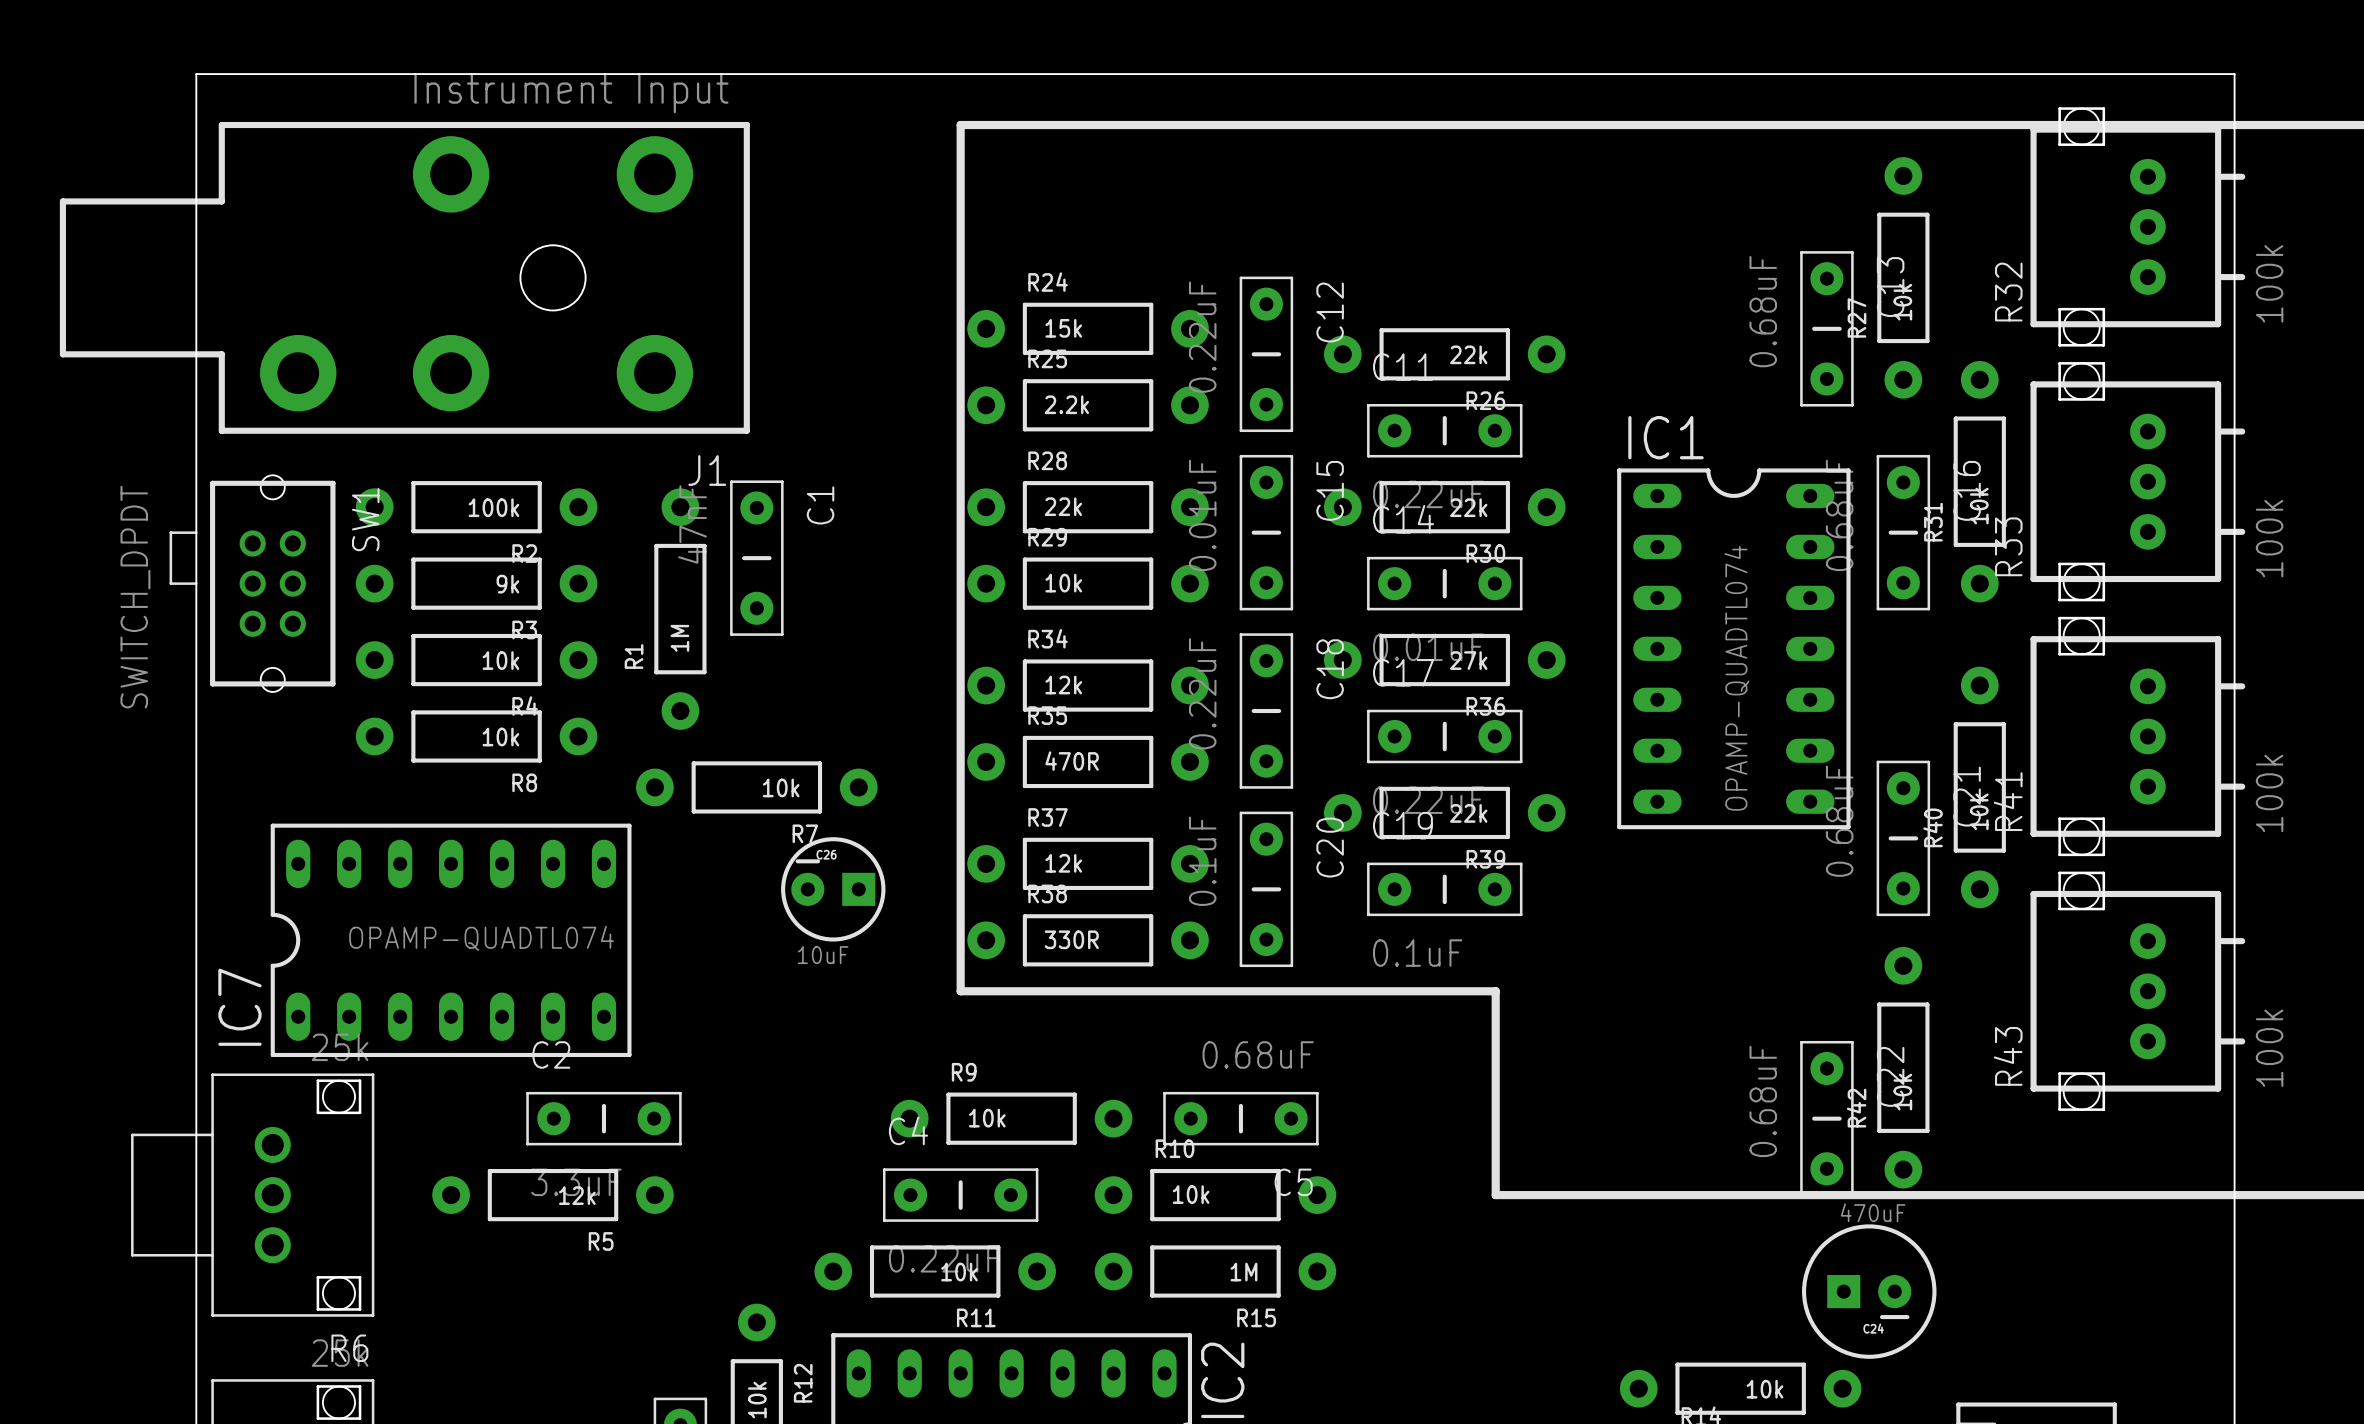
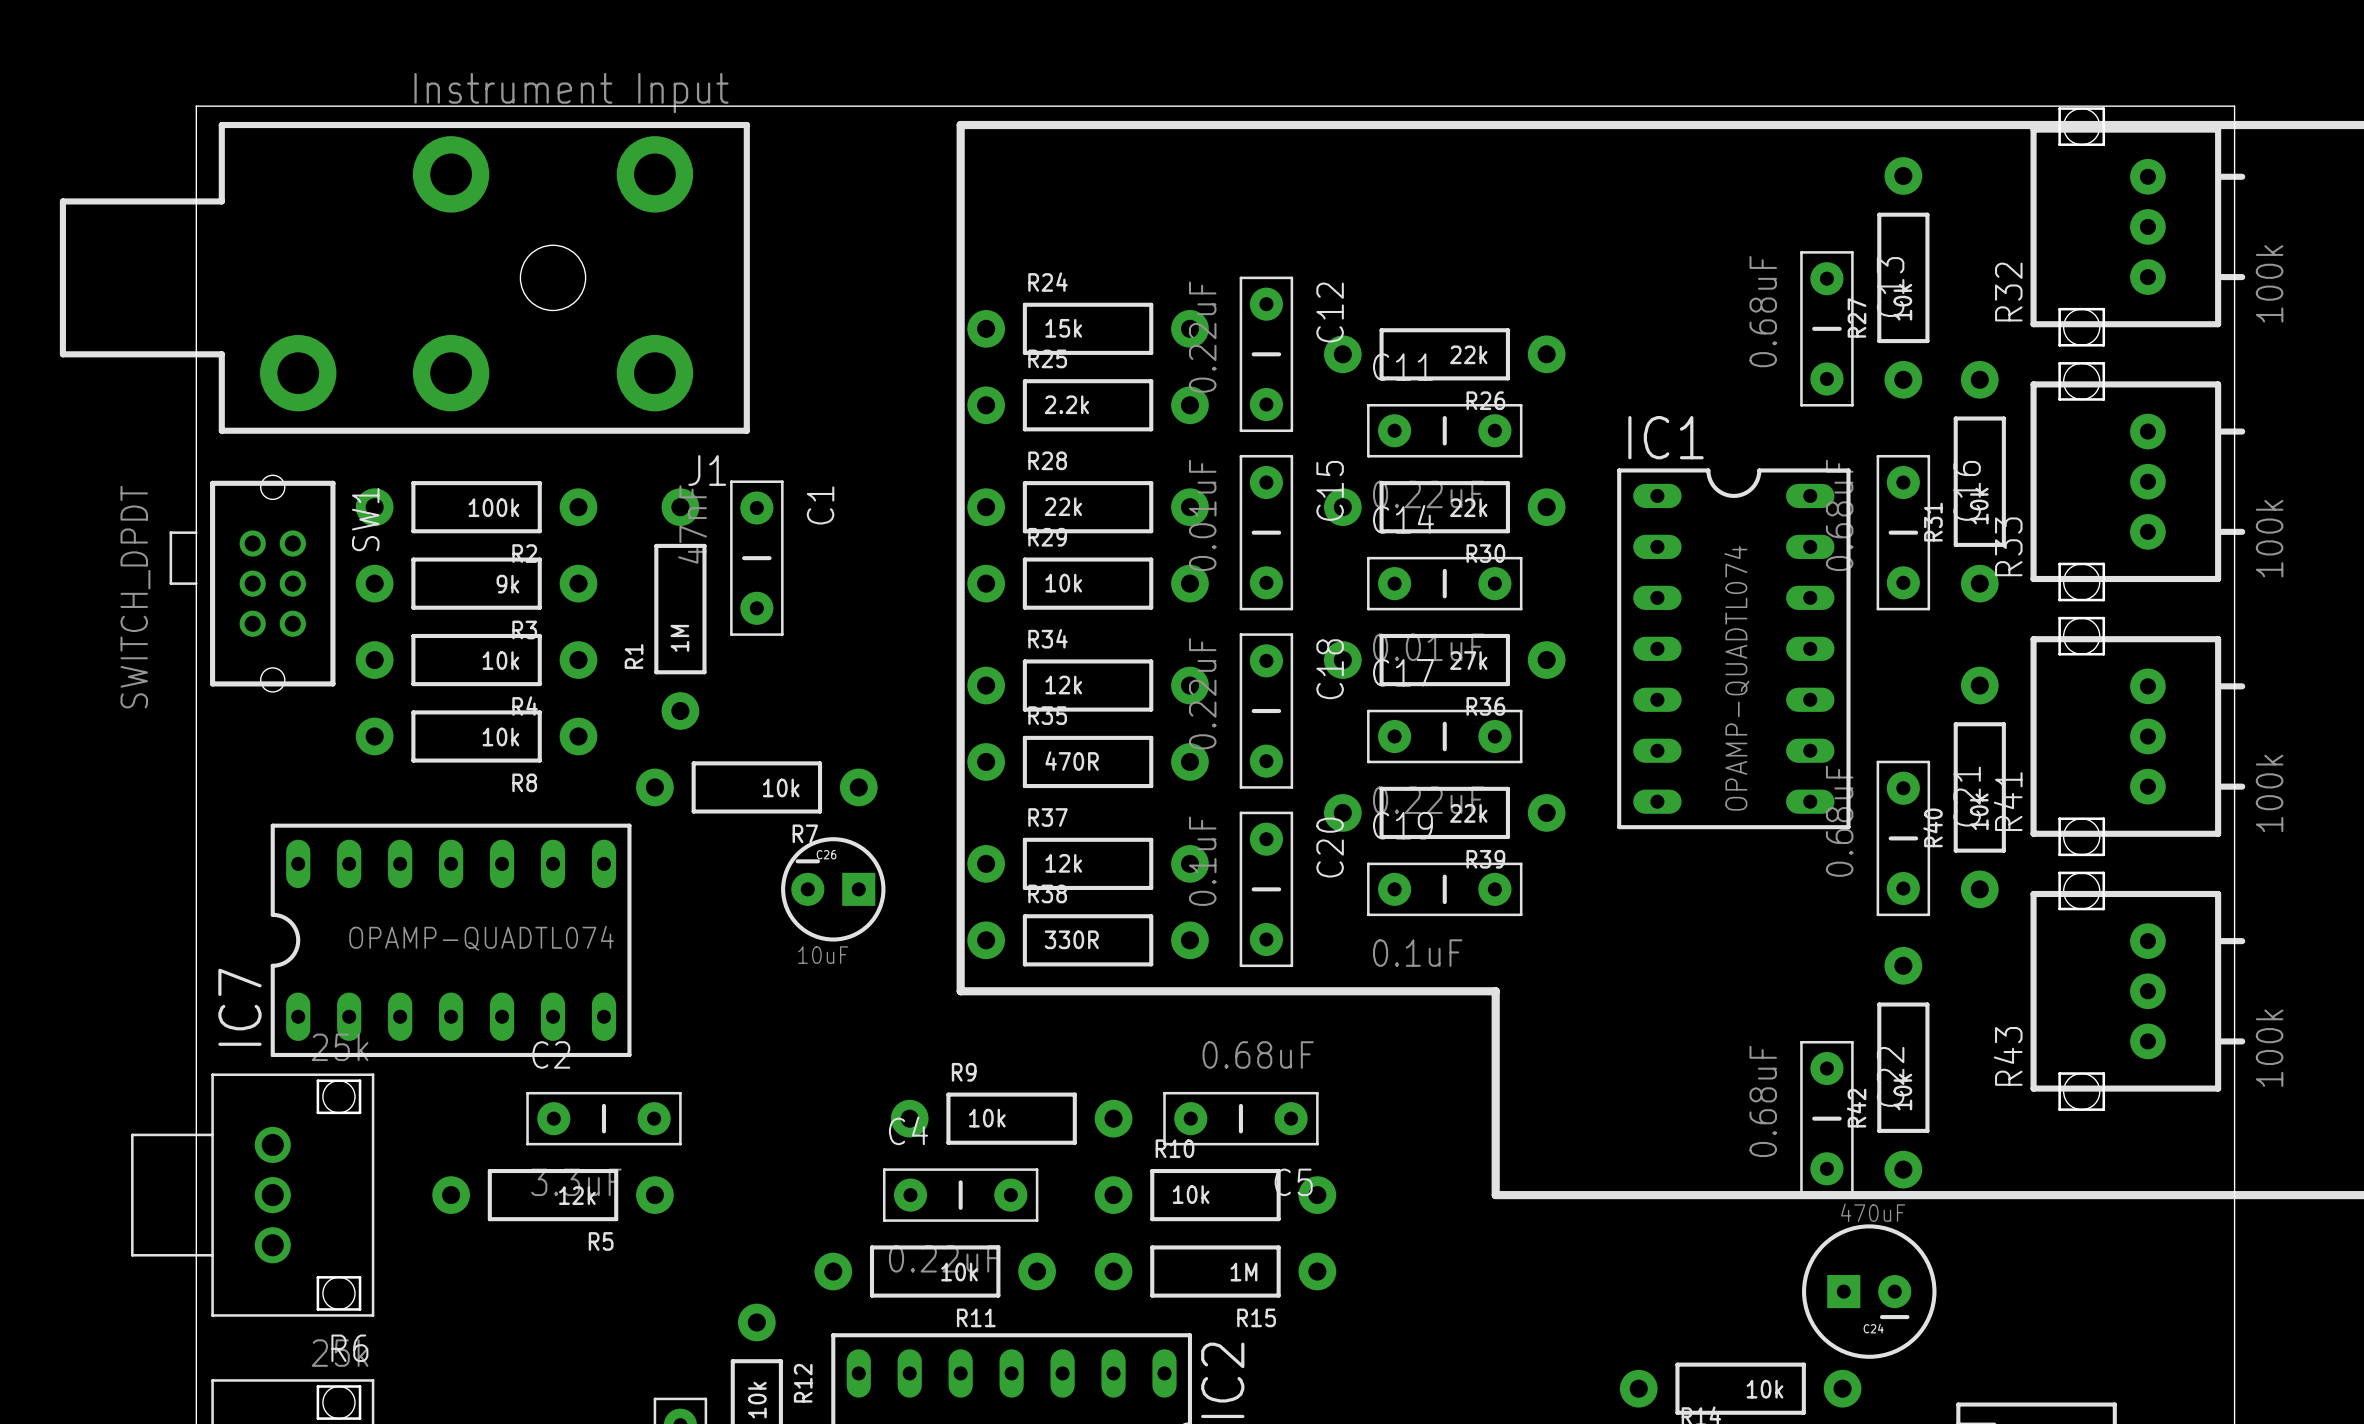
board edge: (196, 106) (196, 74) (2234, 74) (2234, 106) -> (196, 106) (2234, 106)

